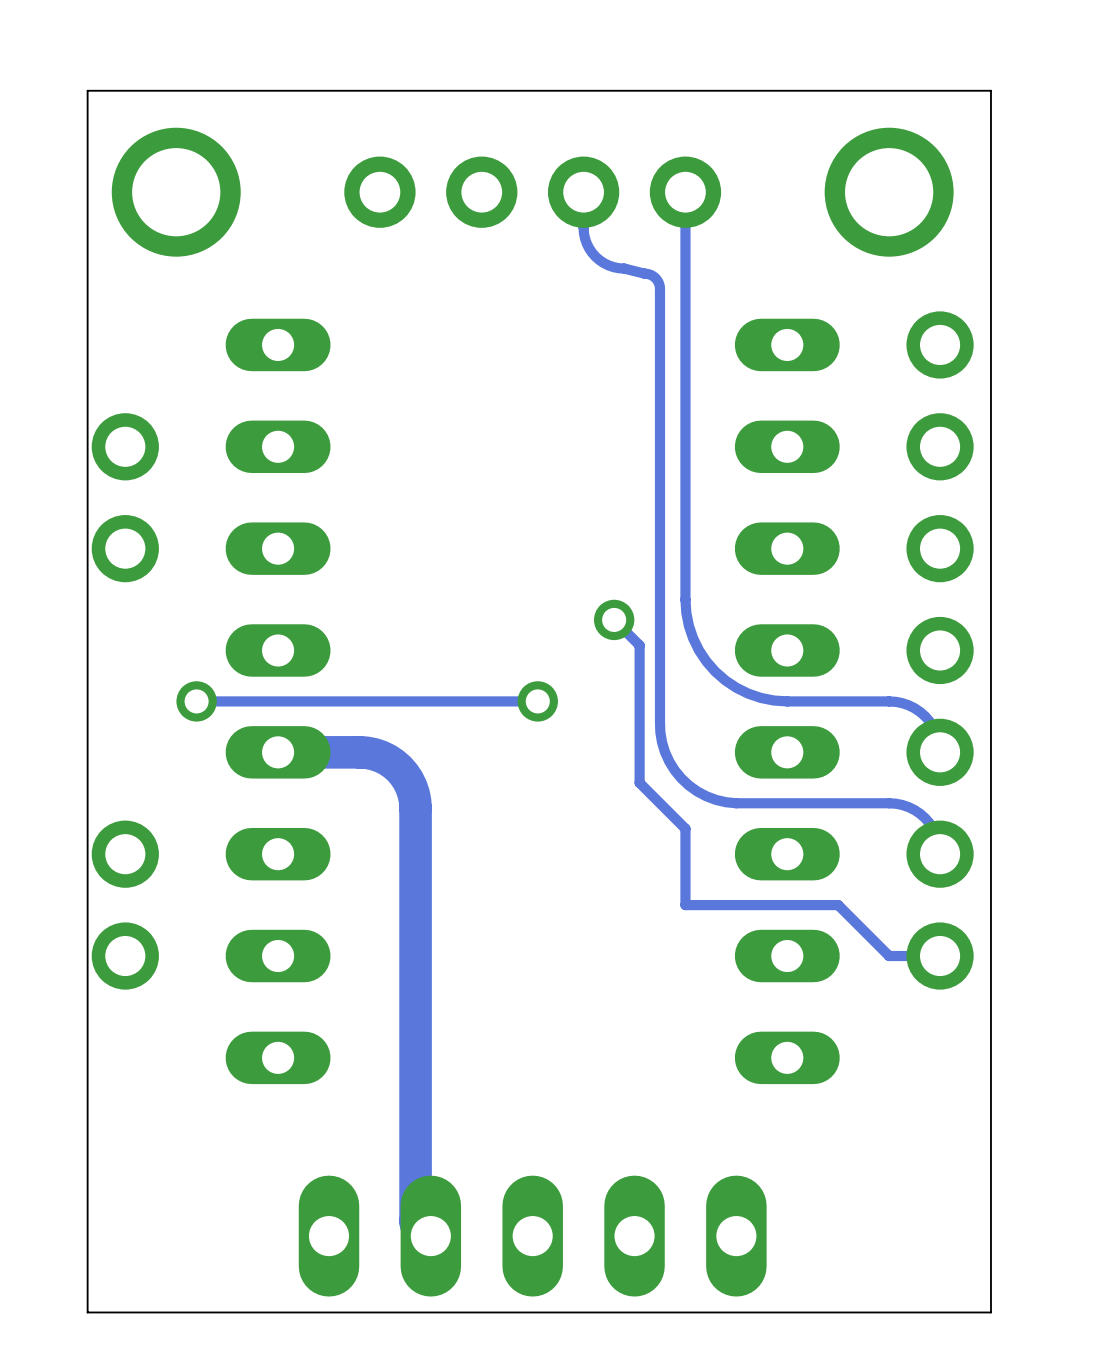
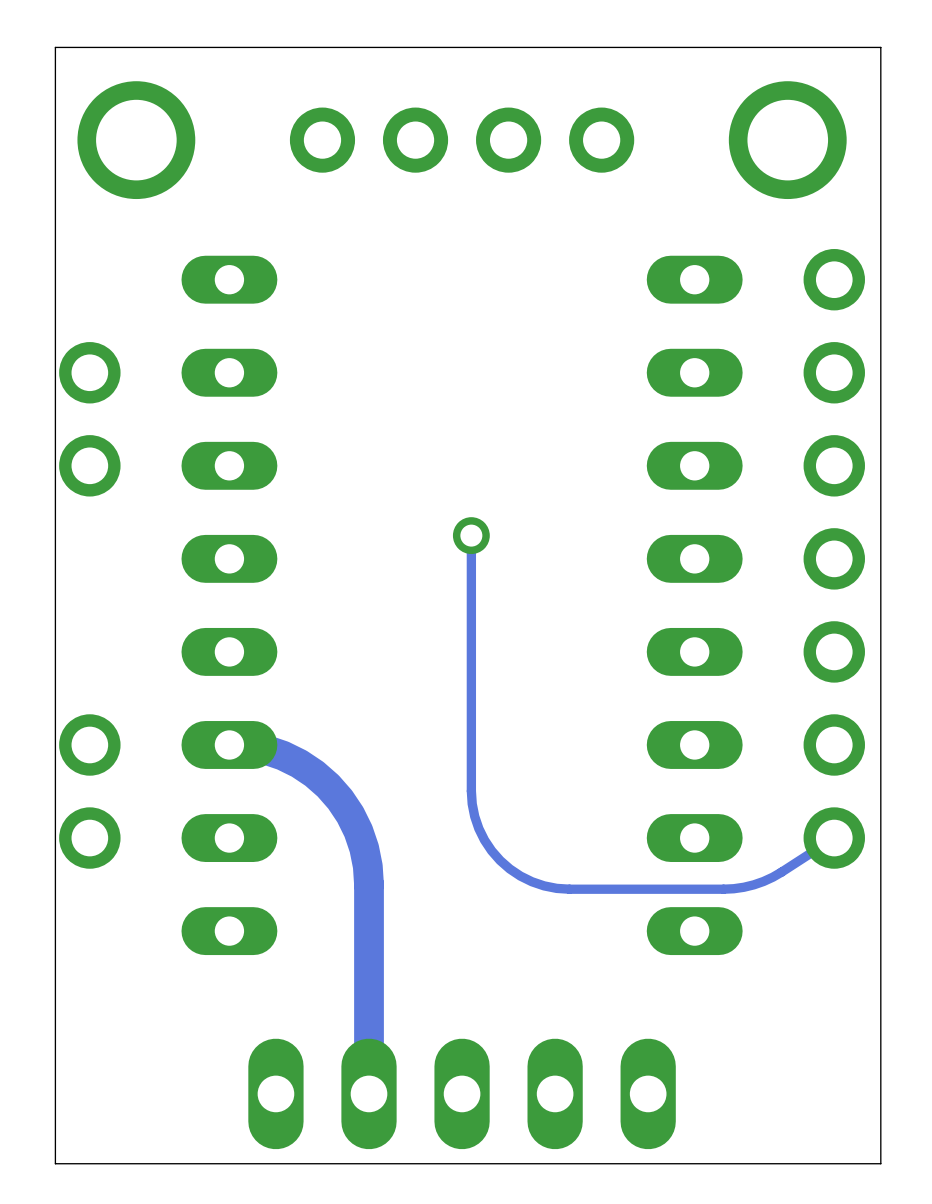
track: (583, 192) (583, 233) (592, 252) (608, 265) (652, 275) (657, 281) (659, 286) (659, 721) (662, 742) (669, 761) (688, 785) (706, 796) (726, 802) (889, 803) (908, 807) (920, 813) (929, 823) (936, 834) (940, 854) -> none
track: (685, 192) (685, 599) (686, 612) (693, 638) (699, 650) (715, 671) (736, 687) (760, 697) (787, 701) (889, 701) (908, 705) (920, 711) (929, 721) (936, 732) (940, 752) -> none
track: (614, 619) (639, 645) (639, 782) (685, 828) (685, 905) (838, 905) (889, 956) (940, 956) -> (471, 535) (472, 803) (474, 816) (484, 840) (500, 860) (509, 868) (531, 881) (556, 888) (733, 888) (753, 884) (772, 877) (834, 838)
via: (614, 619) -> none
via: none -> (471, 535)
via: (196, 701) -> none
track: (537, 701) (196, 701) -> none
via: (537, 701) -> none
track: (278, 752) (359, 752) (374, 754) (387, 759) (399, 768) (408, 780) (413, 793) (415, 808) (415, 1220) (420, 1231) (430, 1236) -> (229, 744) (265, 749) (299, 763) (328, 785) (350, 814) (358, 831) (364, 848) (369, 884) (369, 1093)

